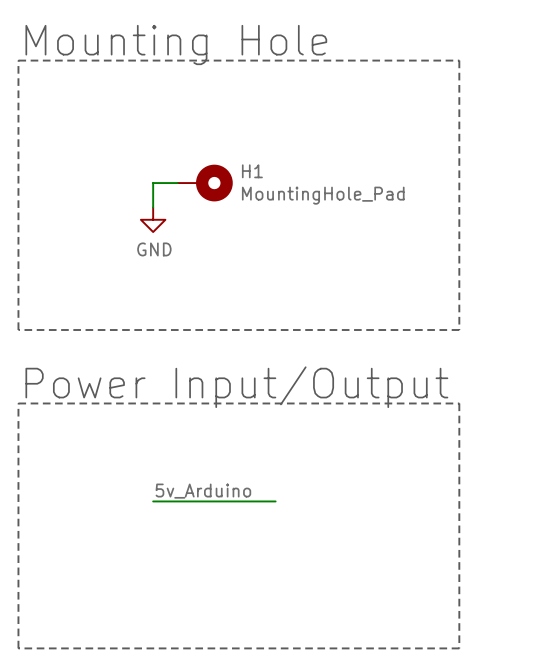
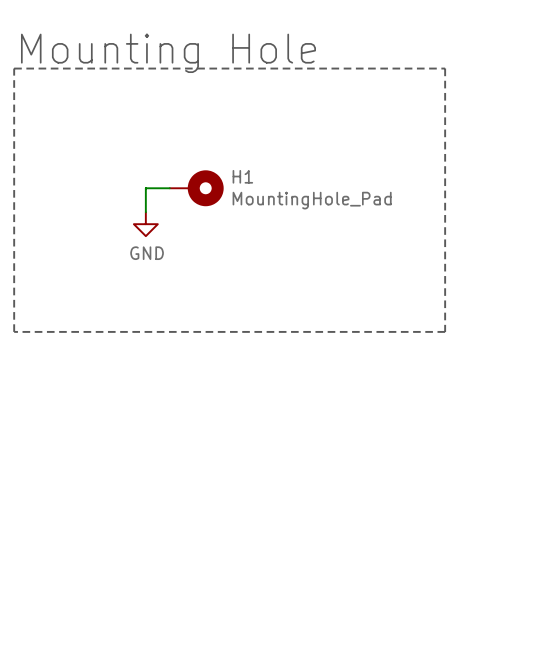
text: Power Input/Output (236, 387) -> none
line: (18, 403) (459, 403) (459, 648) (18, 648) (18, 403) -> none
label: 5v_Arduino (203, 491) -> none
wire: (153, 501) (275, 501) -> none

